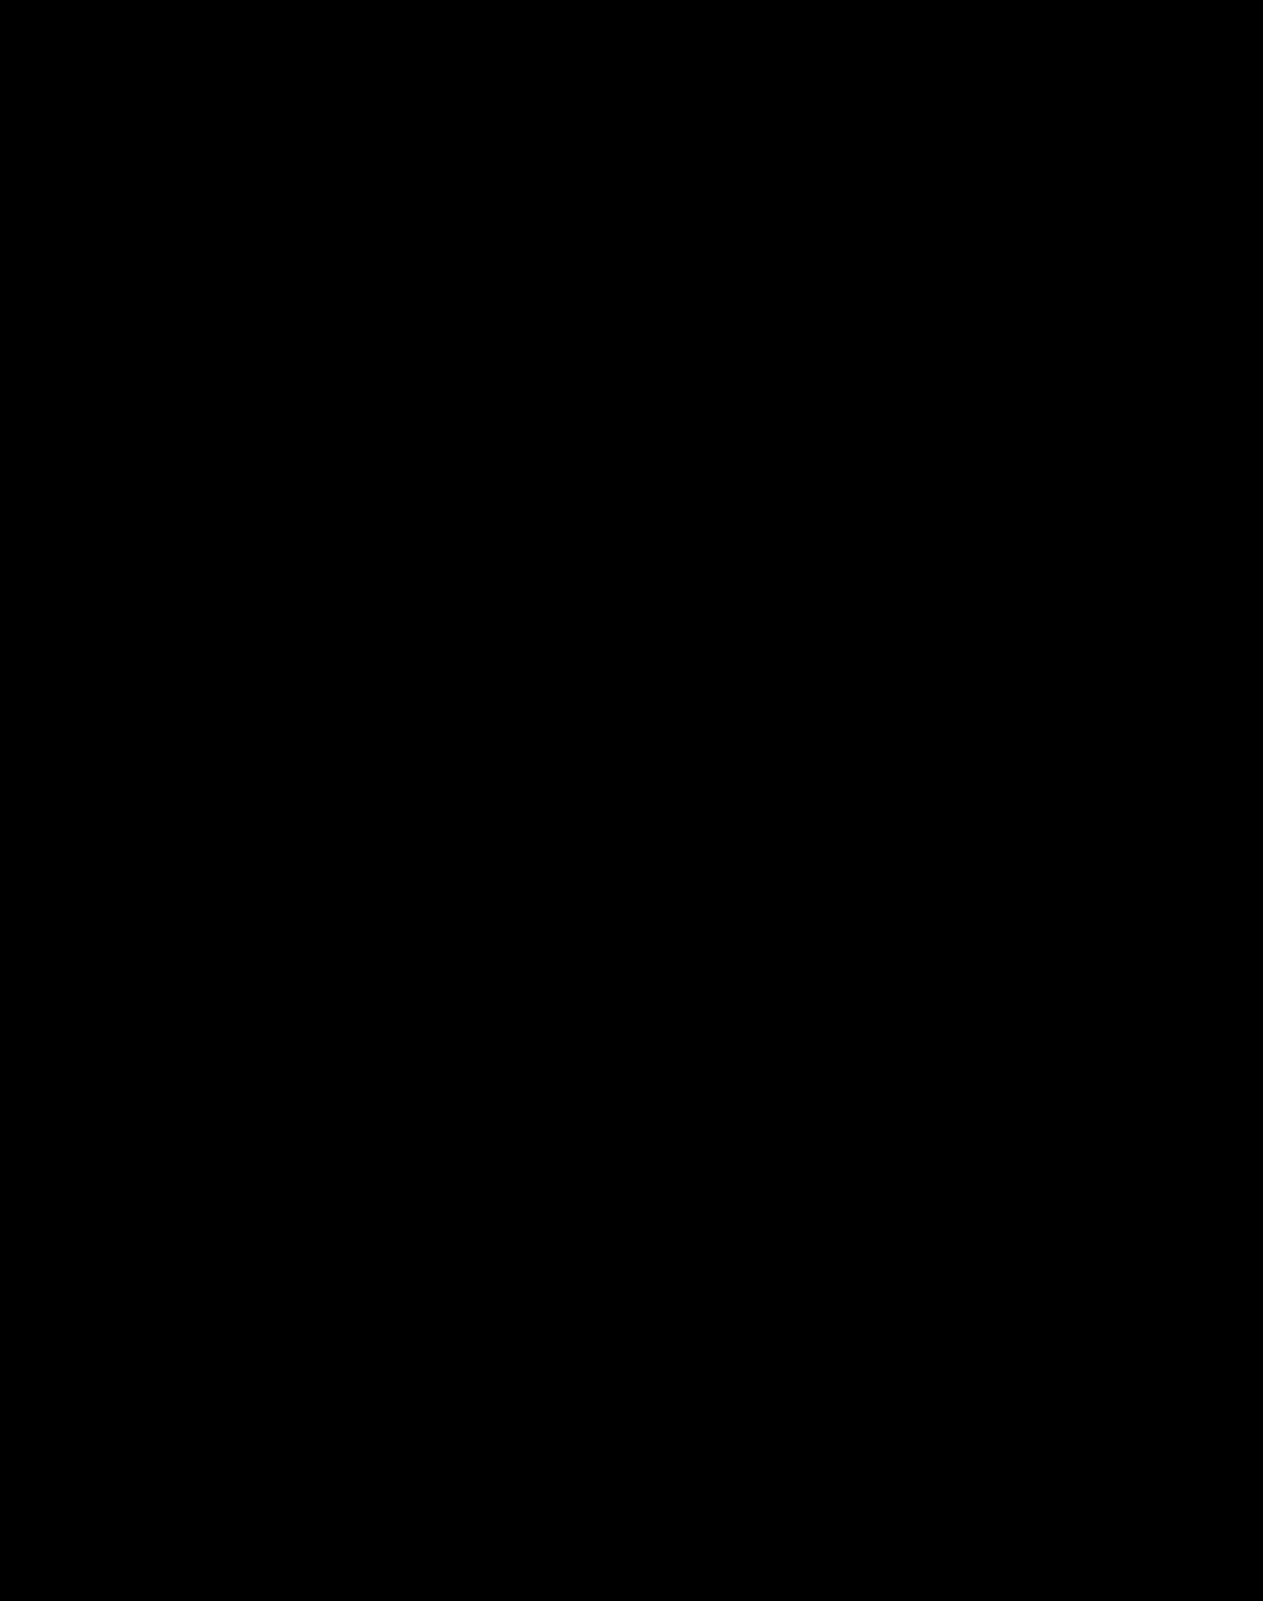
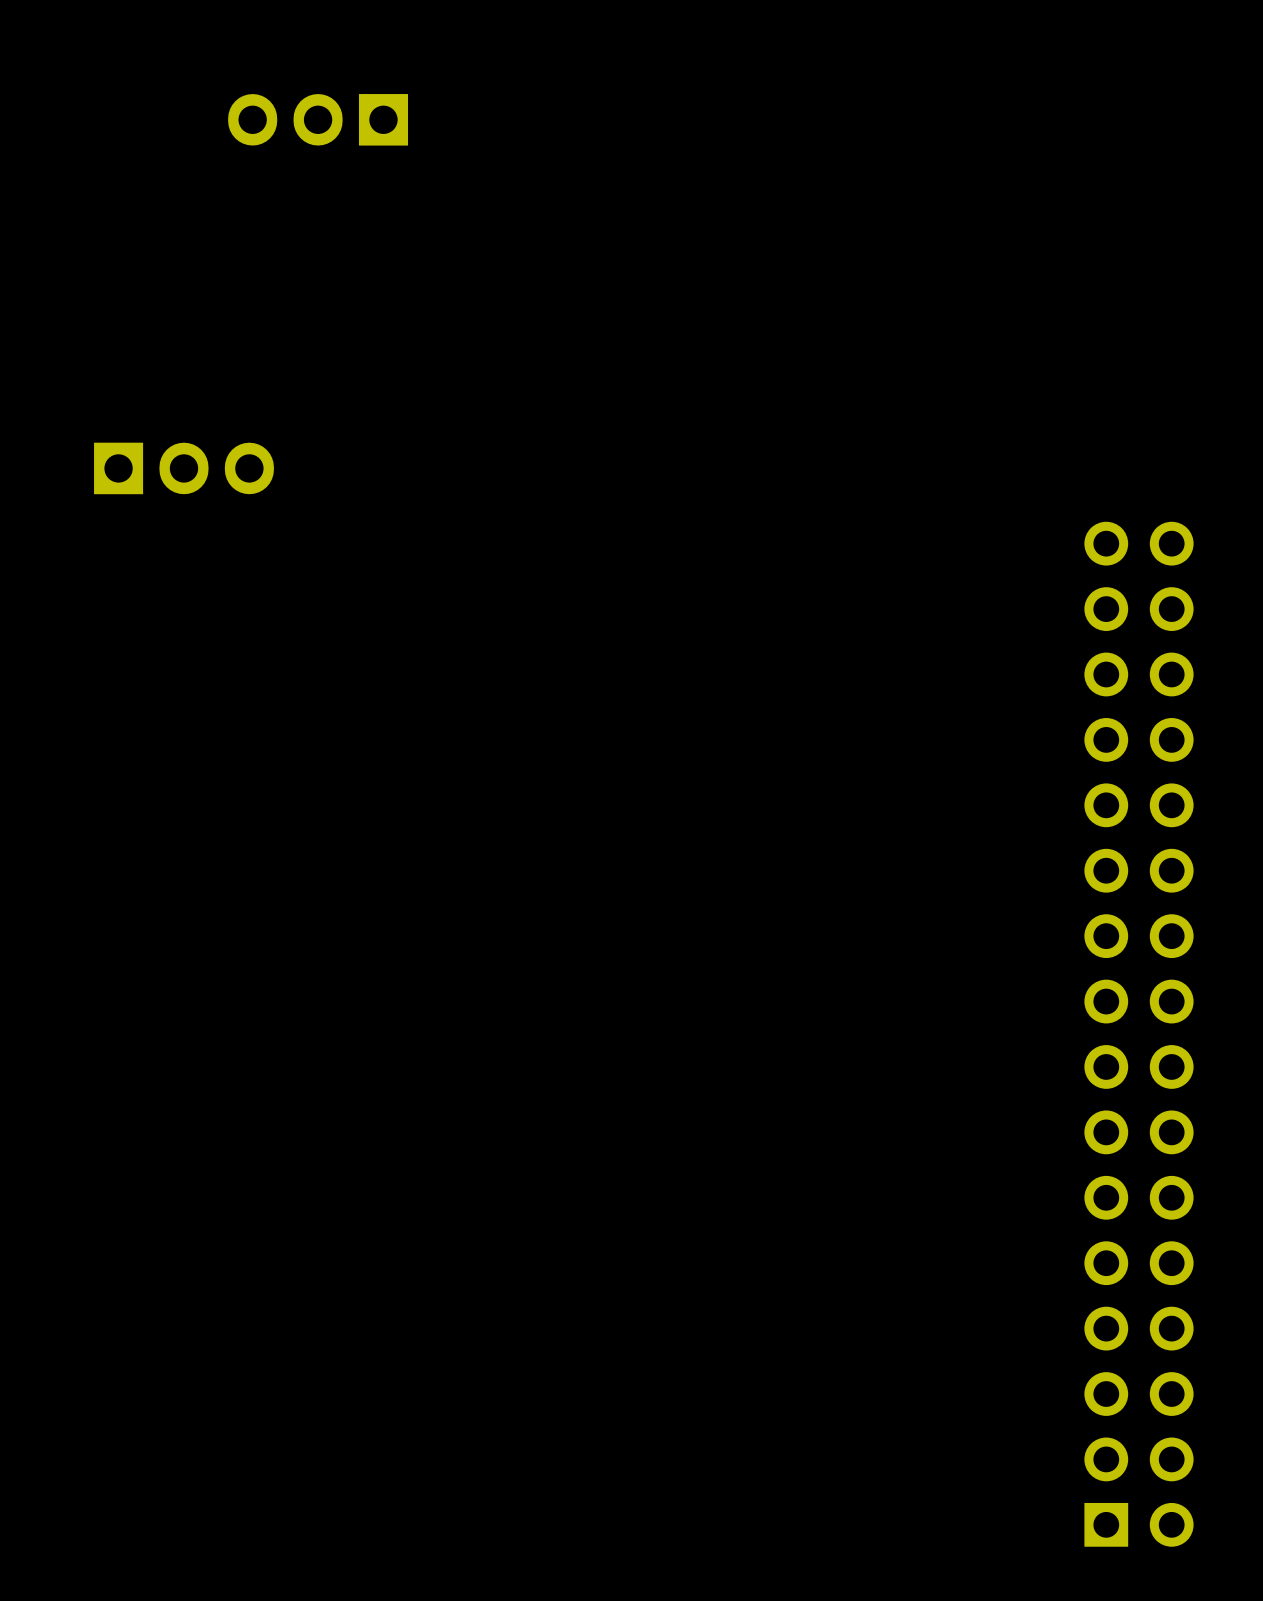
part: none -> (318, 119)
part: none -> (183, 468)
part: none -> (1138, 1034)

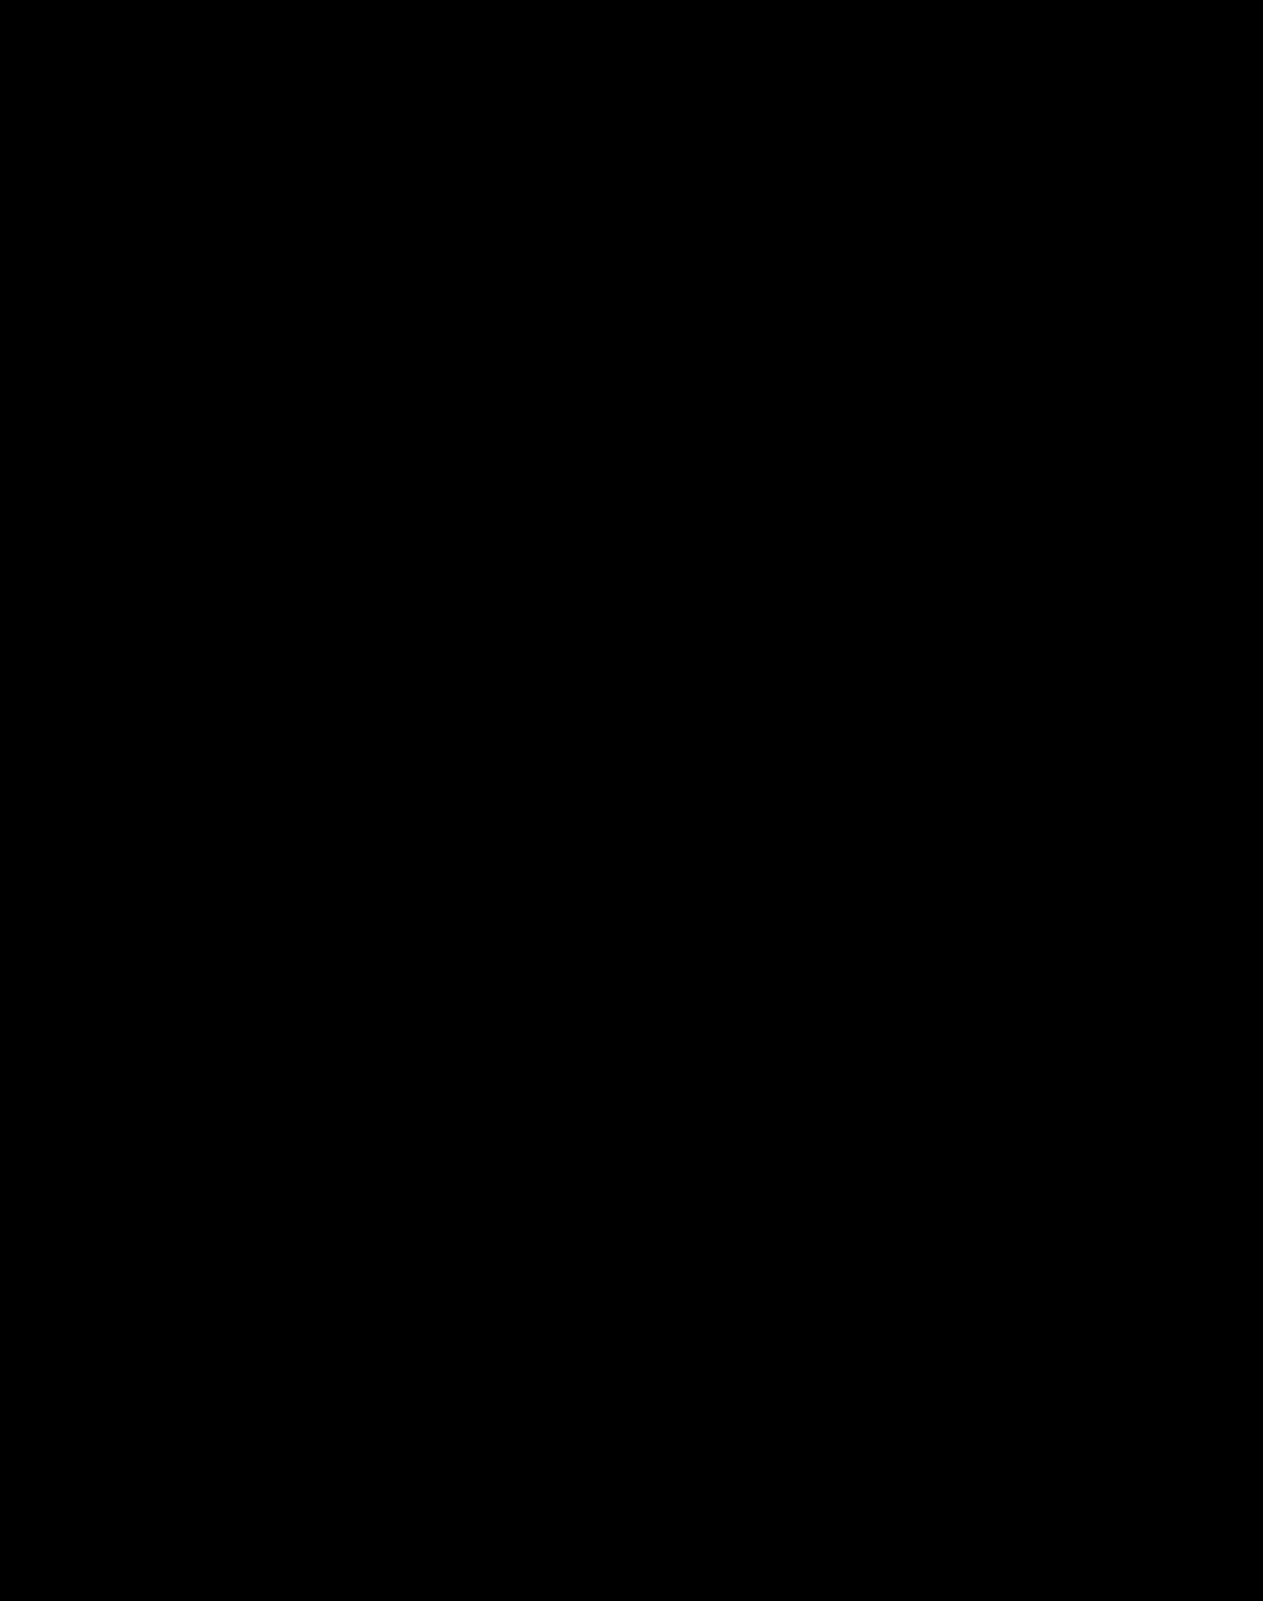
part: (318, 119) -> none
part: (183, 468) -> none
part: (1138, 1034) -> none

